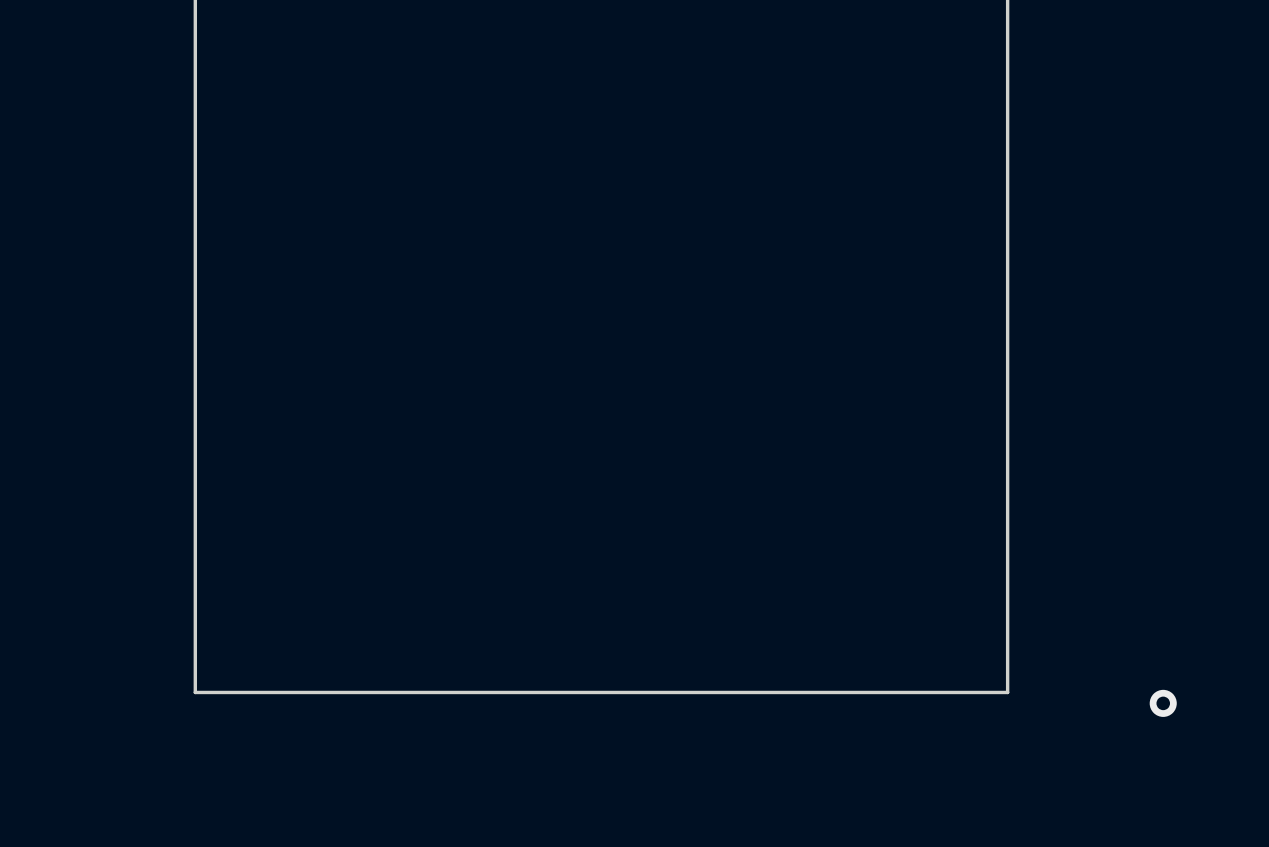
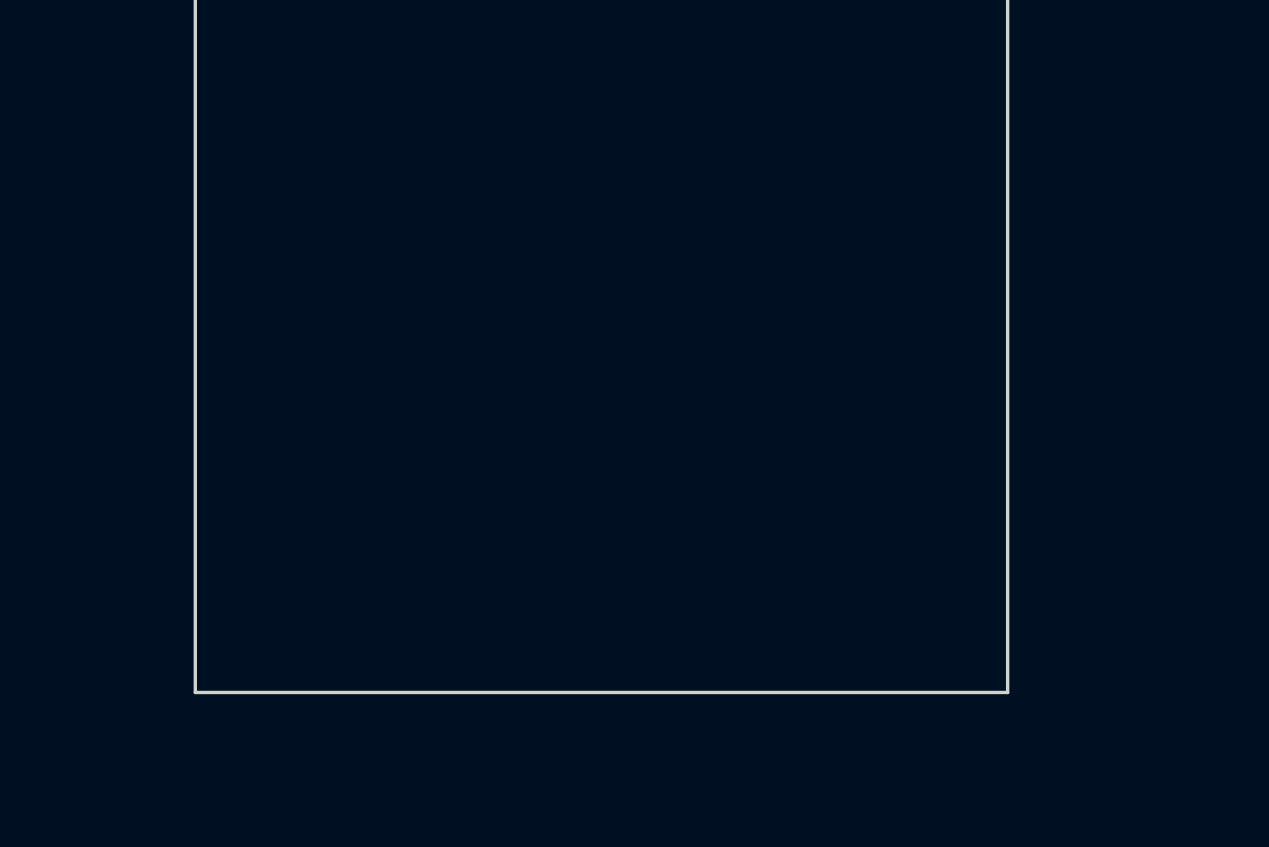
via: (1163, 703) -> none

